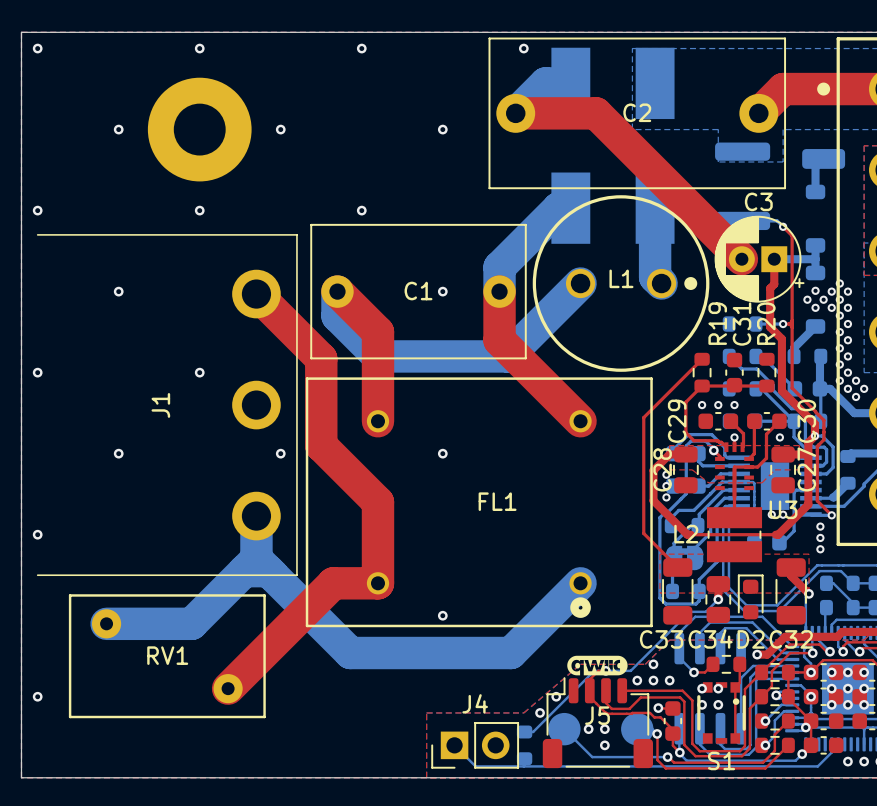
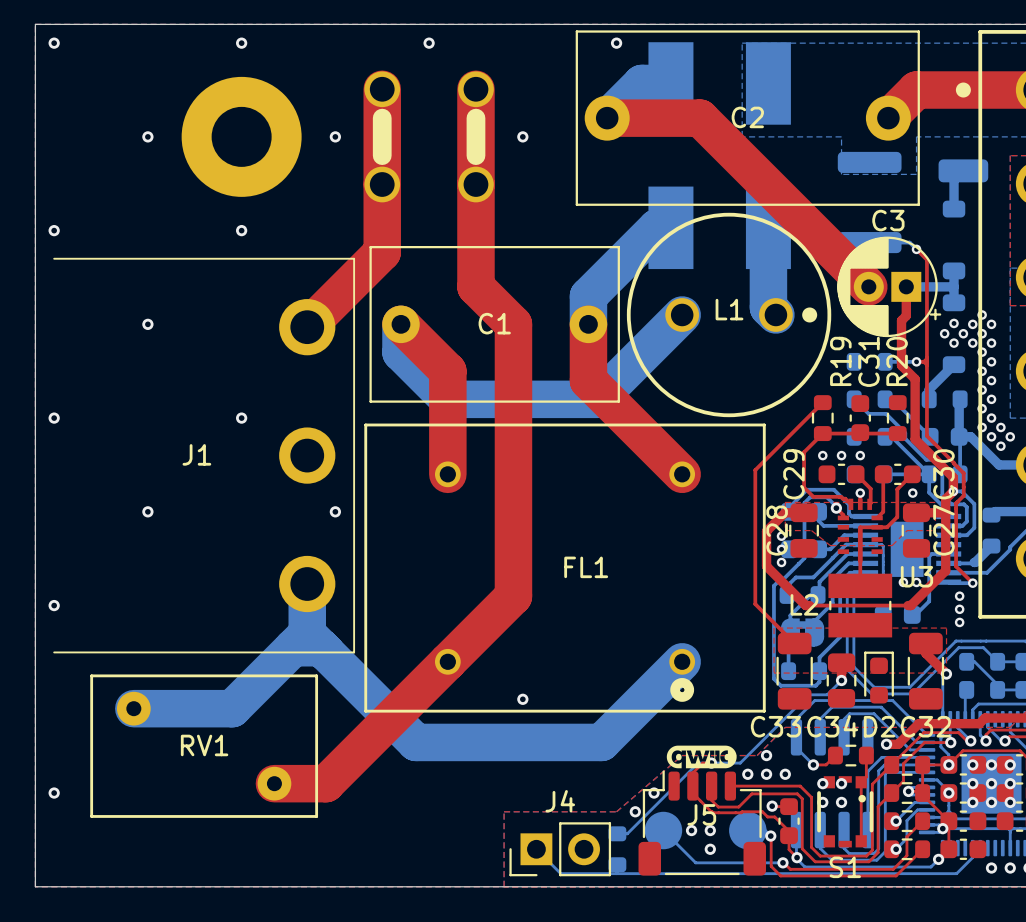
top track: none -> (382, 89) (382, 252) (307, 327)
part: none -> (382, 136)
part: none -> (475, 136)
via: (361, 210) -> none
via: (442, 291) -> none
top track: (256, 294) (321, 358) (321, 445) (377, 502) (377, 583) (333, 583) (228, 688) -> (475, 89) (475, 286) (513, 324) (513, 596) (325, 783) (274, 783)
J1 name rotation: 0° (160, 405) -> 90° clockwise (196, 454)
via: (442, 453) -> none

